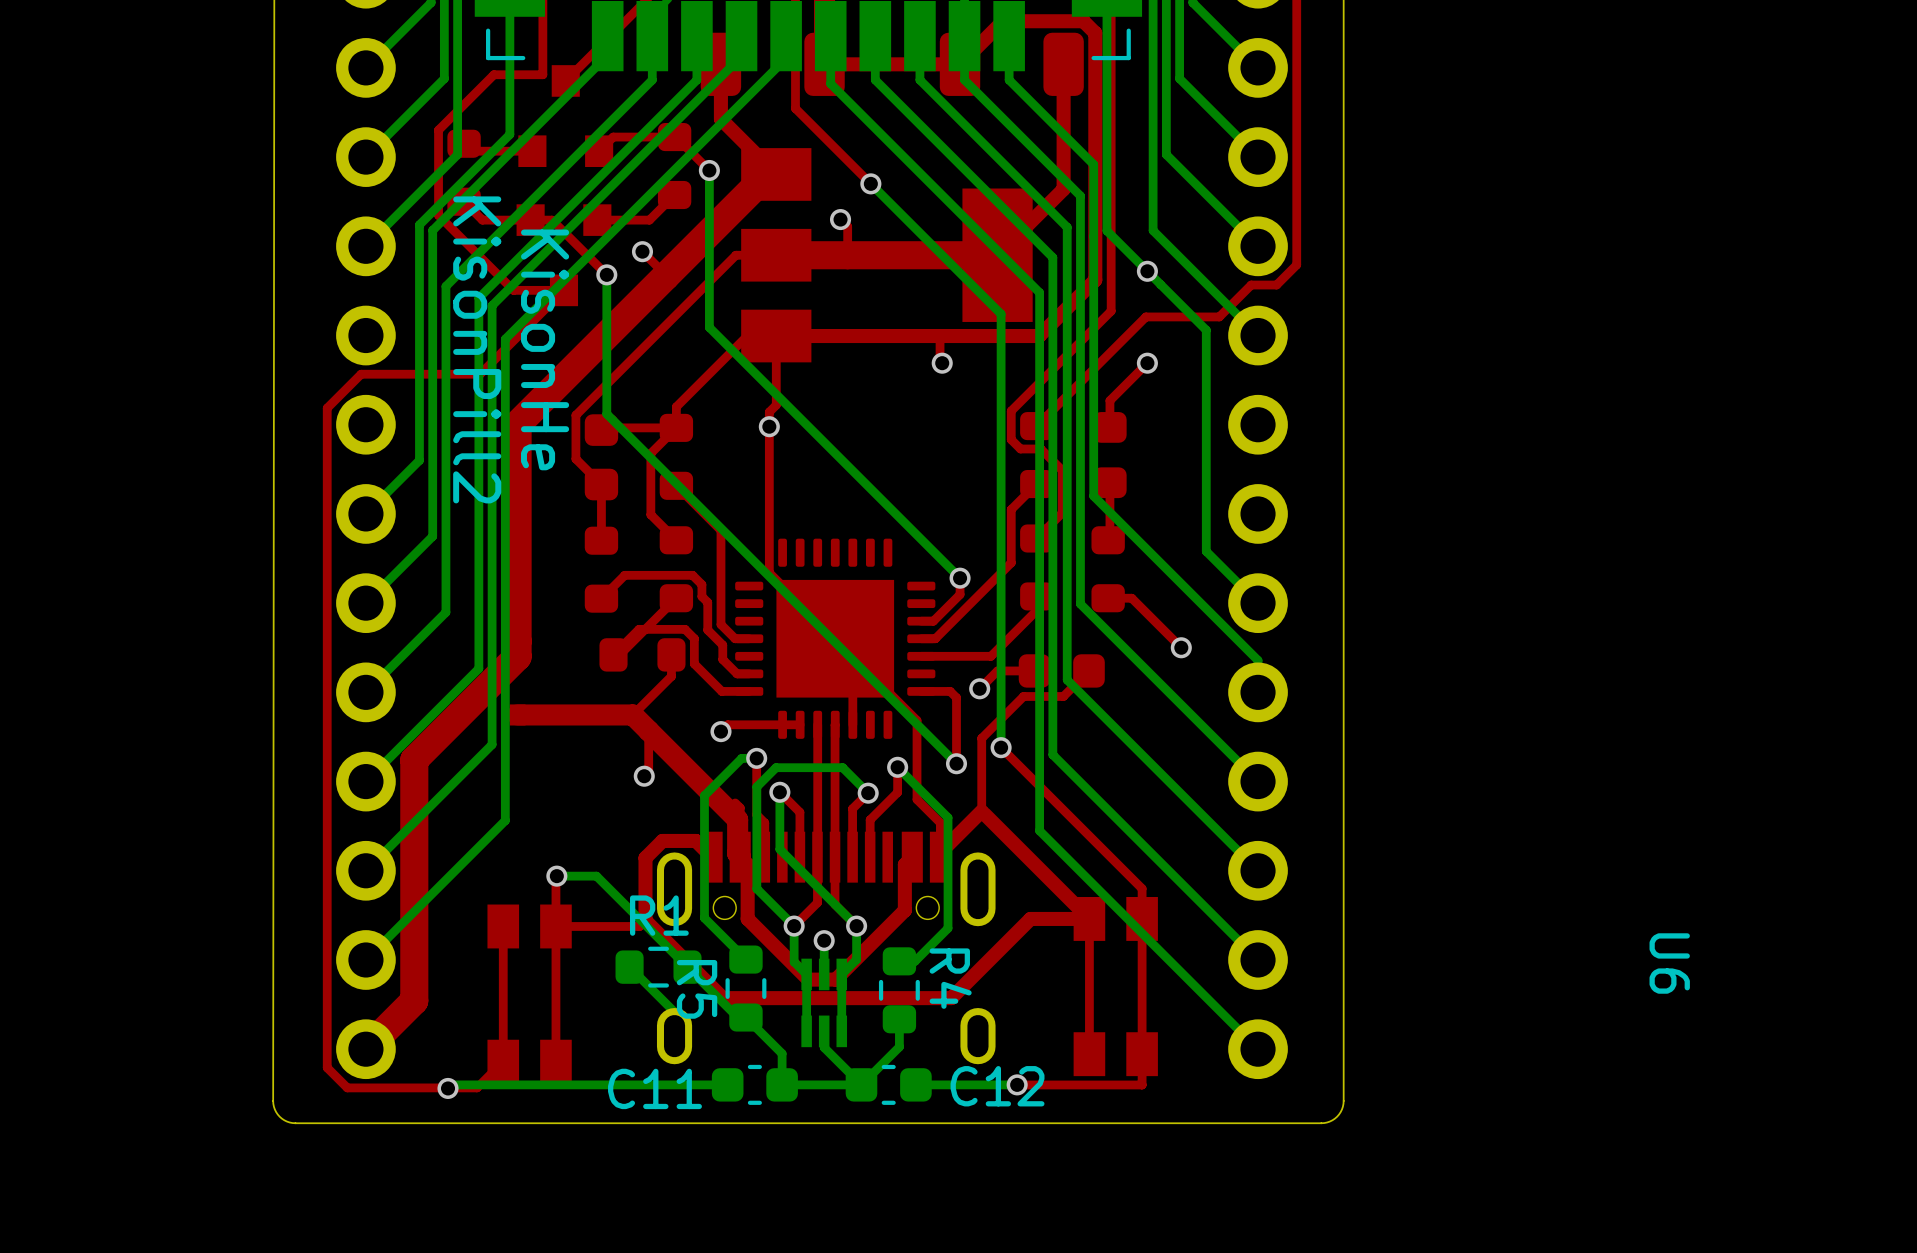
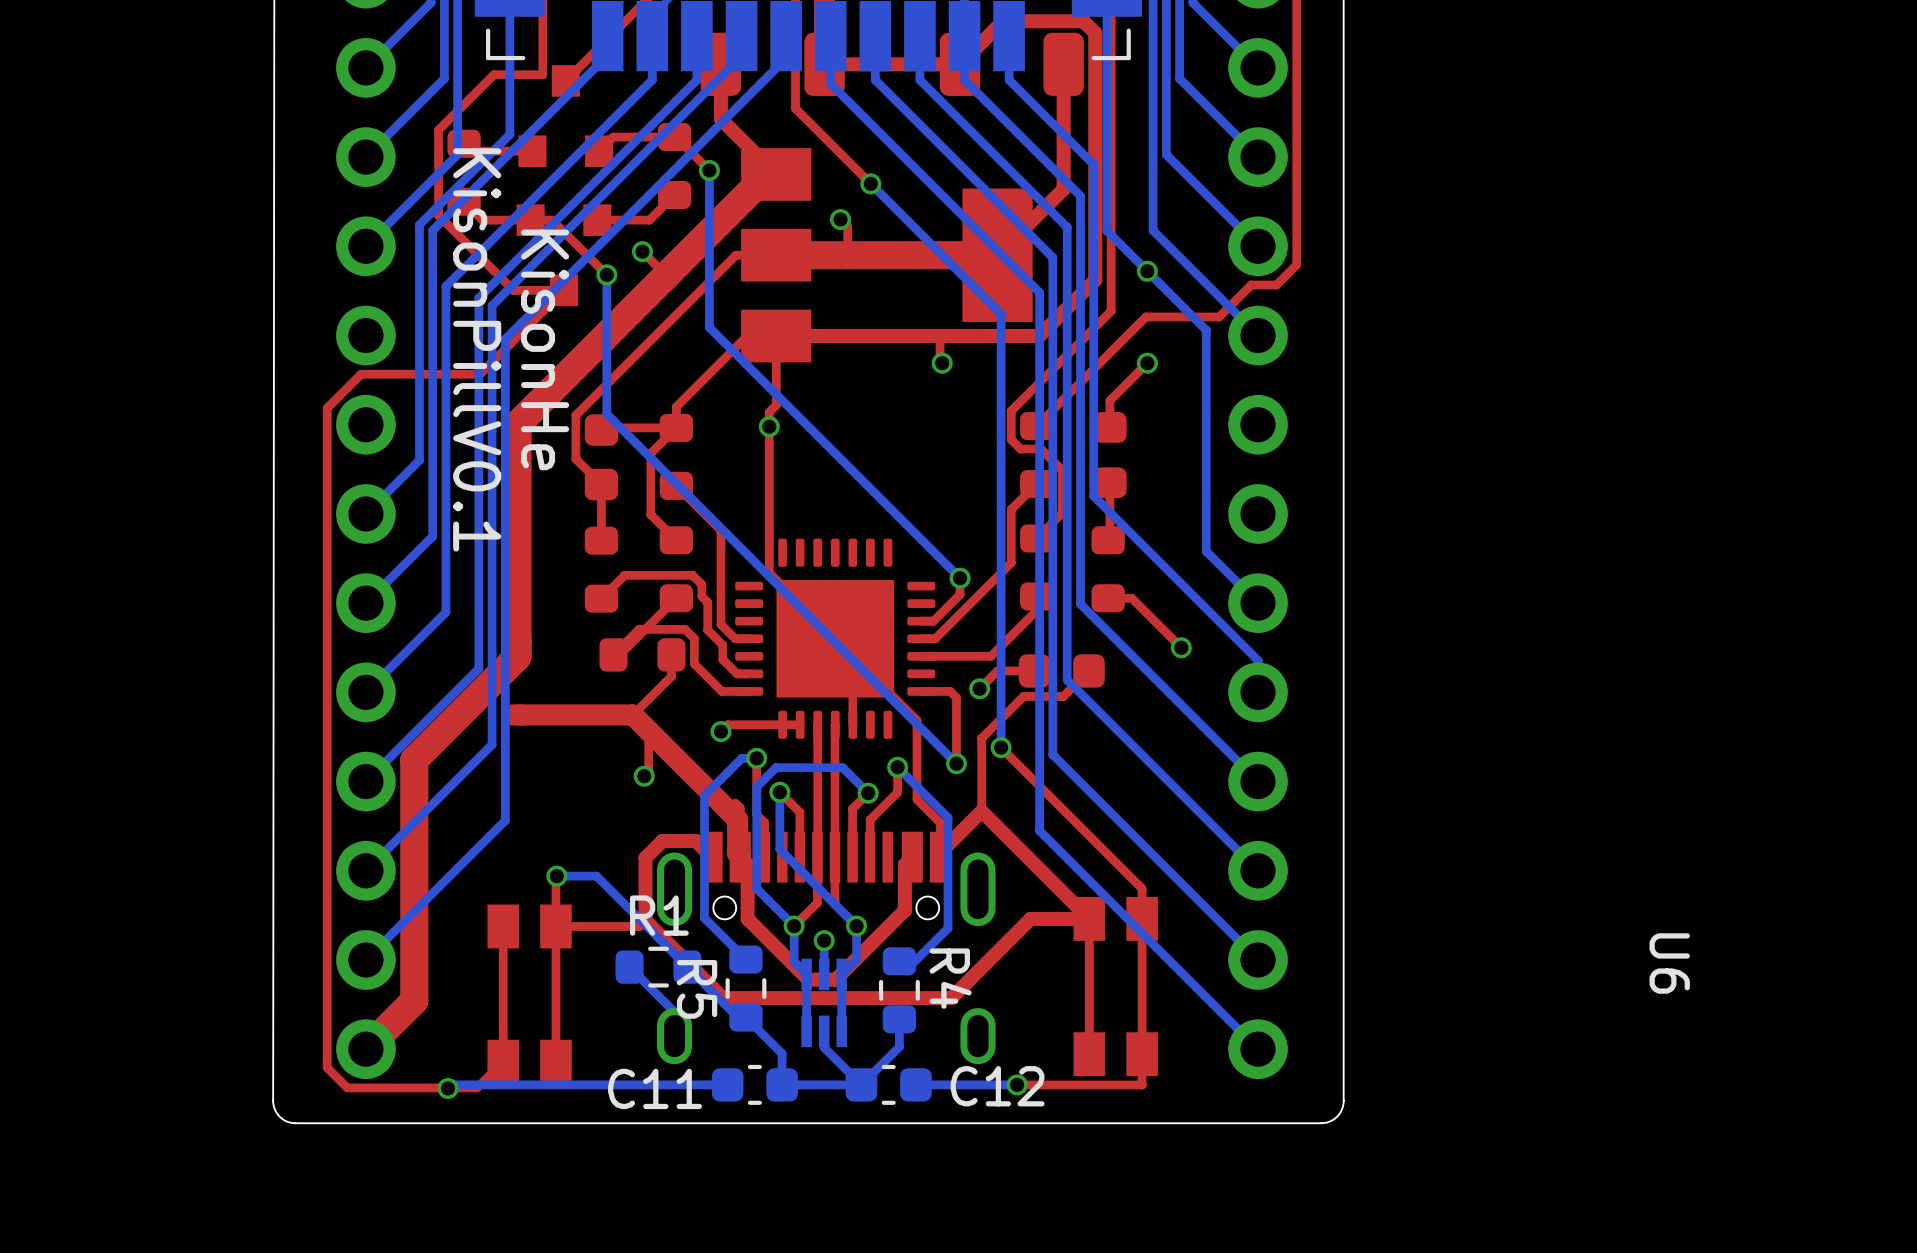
text: KisonPill2 (477, 349) -> KisonPillV0.1 (477, 349)

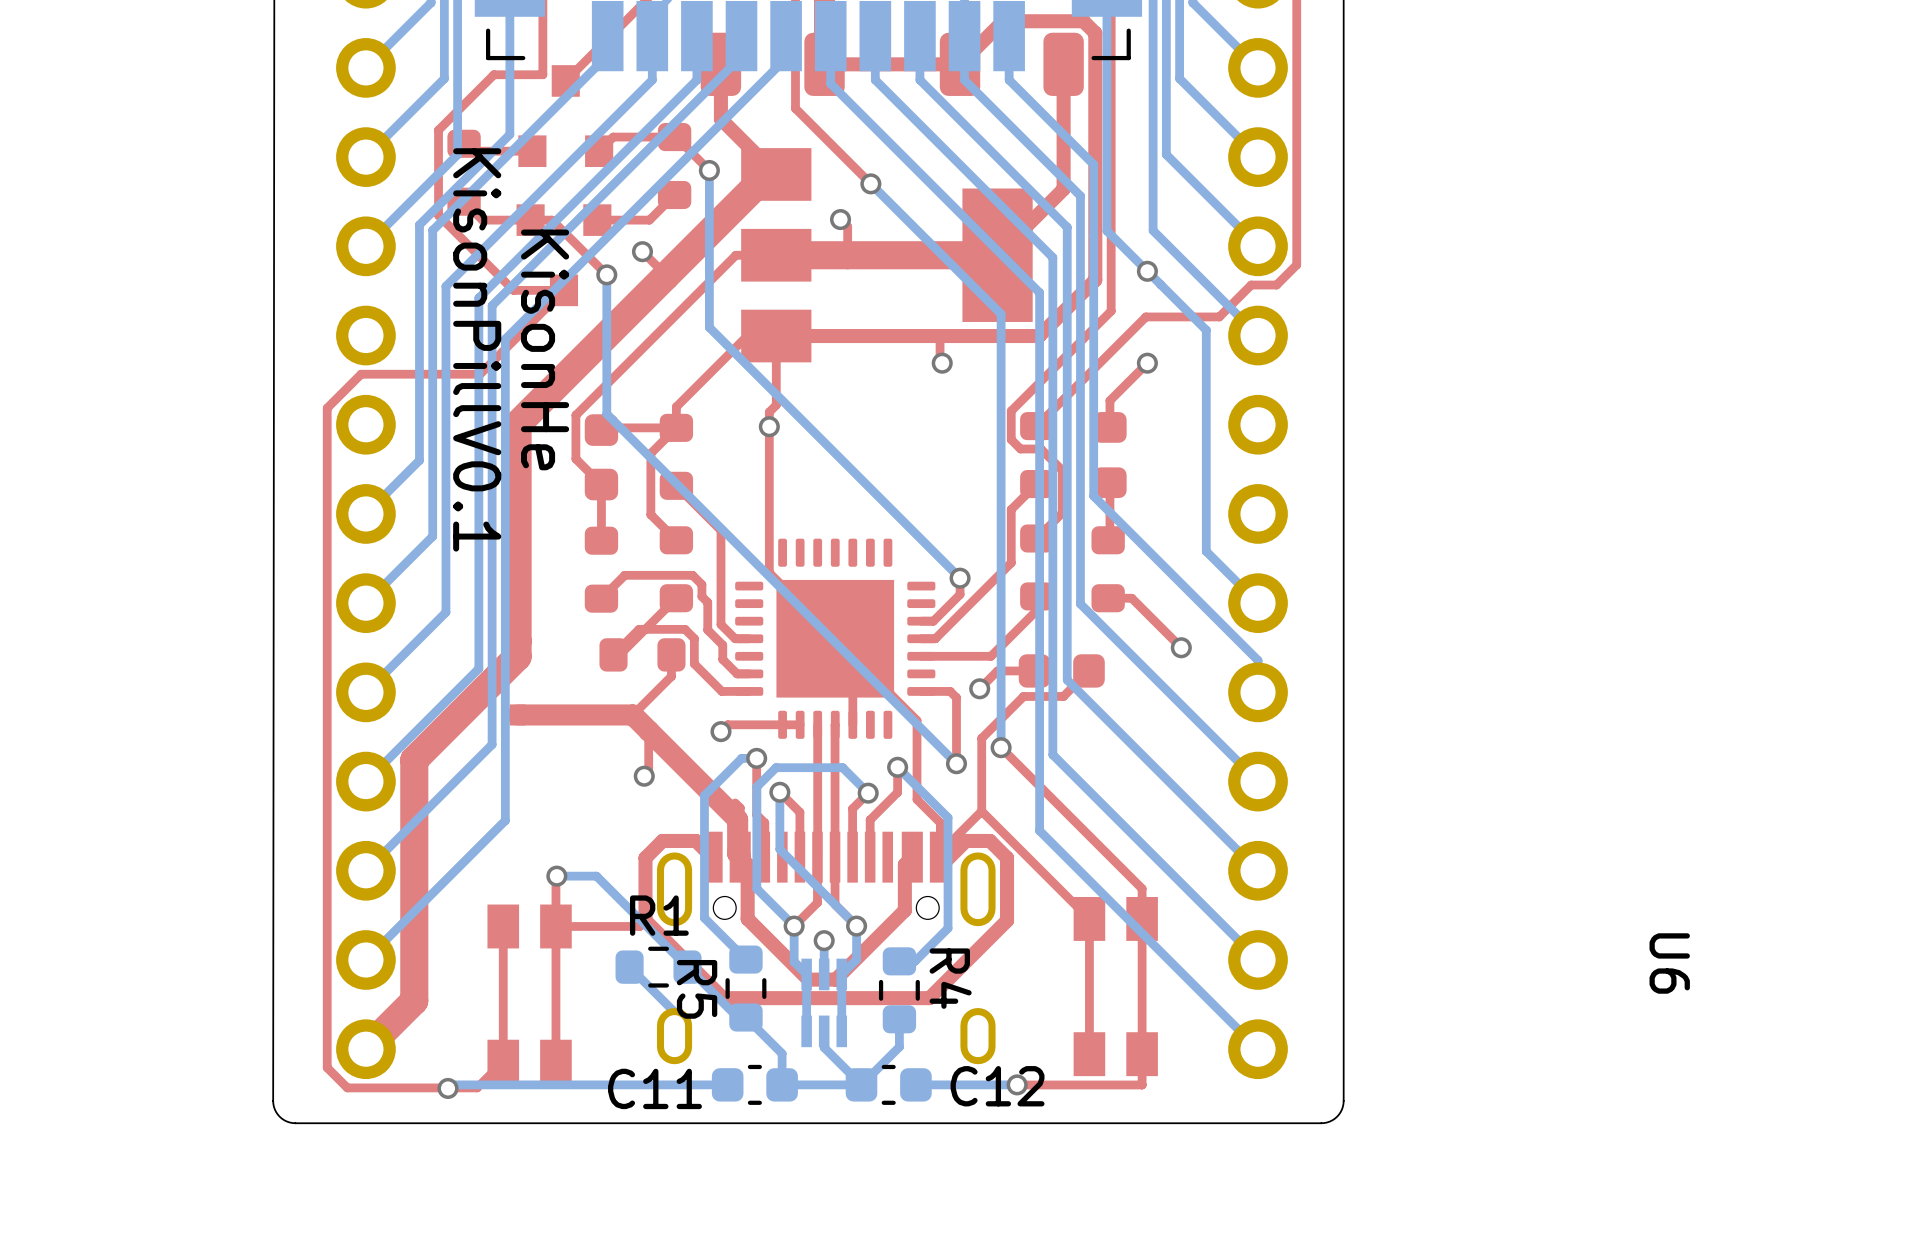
top track width: thick (981, 811) (940, 852) -> thin (981, 811) (940, 852)
top track width: thick (984, 814) (1089, 918) -> thin (984, 814) (1089, 918)
top track: (1089, 918) (1030, 918) (951, 998) (929, 998) -> (940, 866) (965, 840) (990, 840) (1007, 857) (1007, 920) (929, 998)

